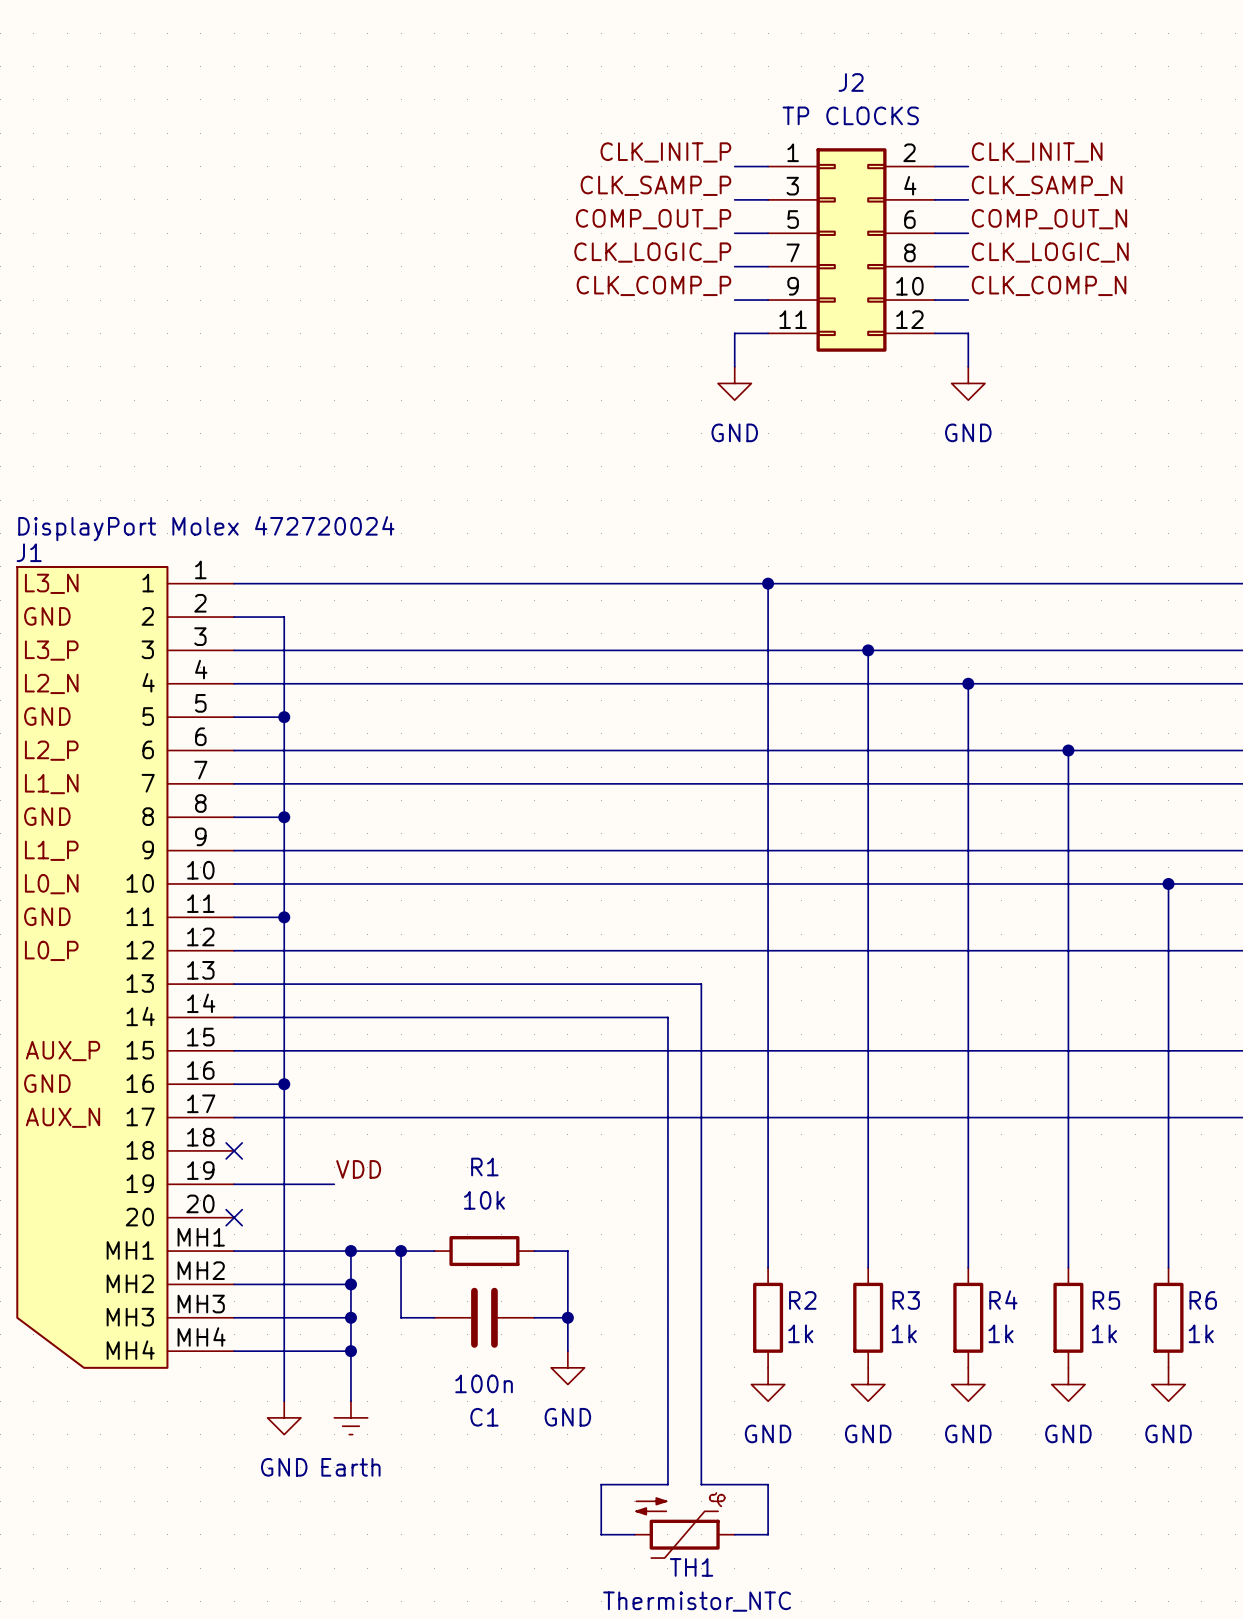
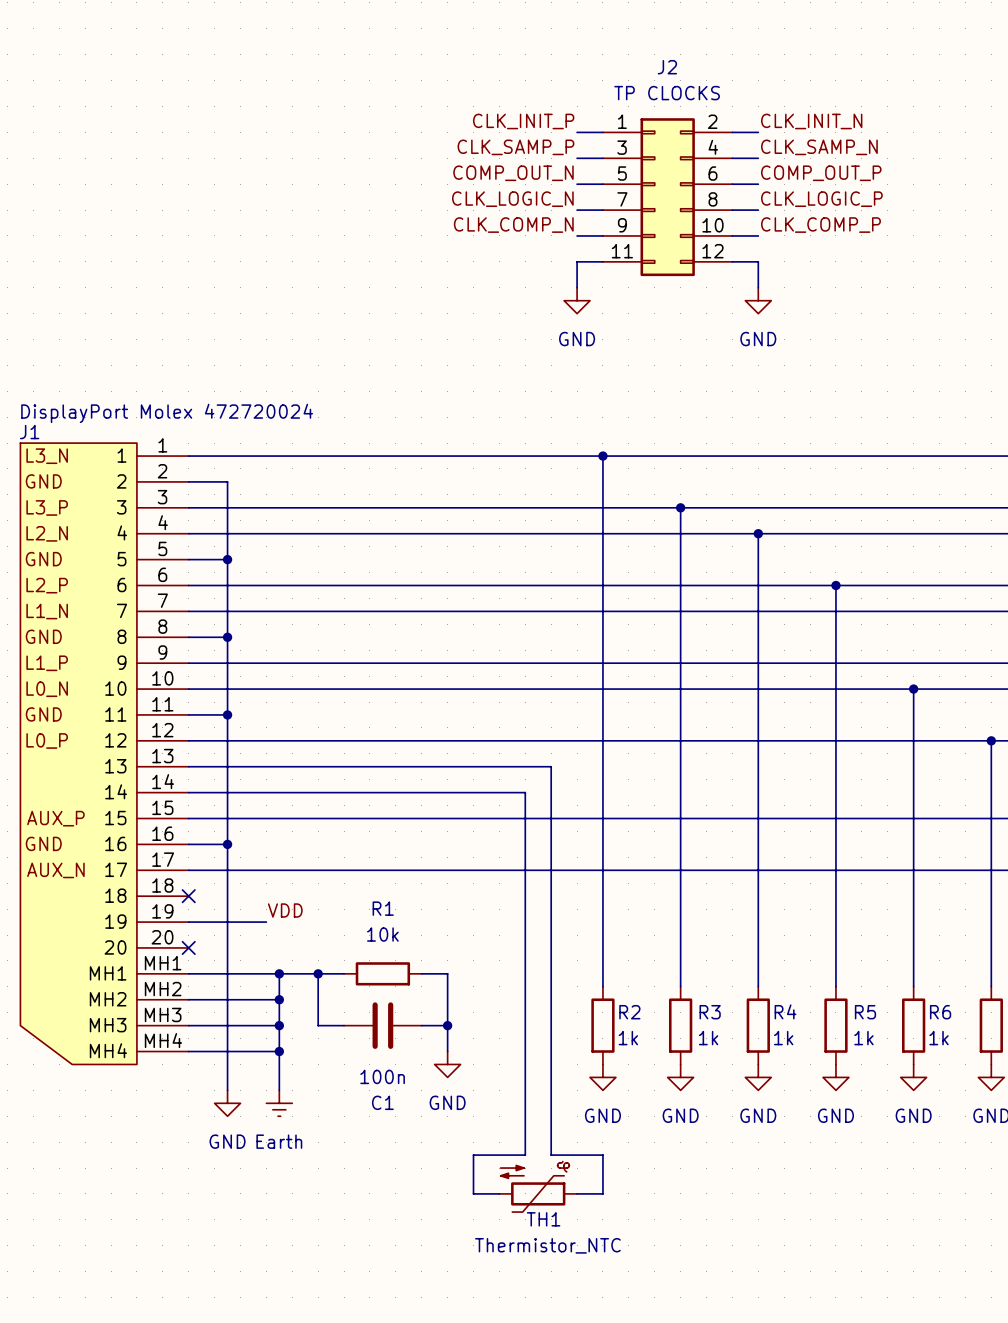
label: COMP_OUT_P (653, 219) -> COMP_OUT_N (513, 173)
label: COMP_OUT_N (1049, 219) -> COMP_OUT_P (821, 173)
label: CLK_LOGIC_P (652, 252) -> CLK_LOGIC_N (512, 199)
label: CLK_LOGIC_N (1050, 252) -> CLK_LOGIC_P (821, 199)
label: CLK_COMP_P (653, 285) -> CLK_COMP_N (513, 225)
label: CLK_COMP_N (1049, 285) -> CLK_COMP_P (820, 225)

